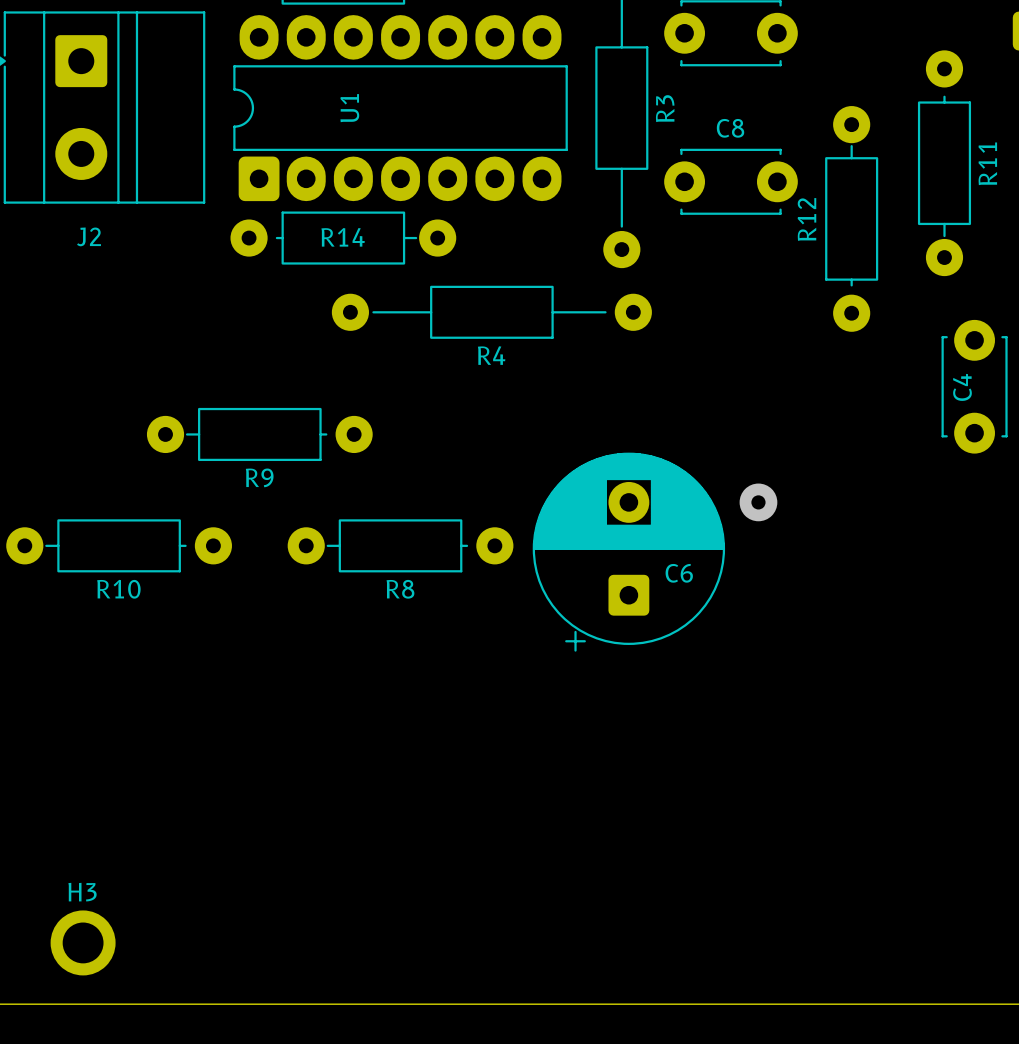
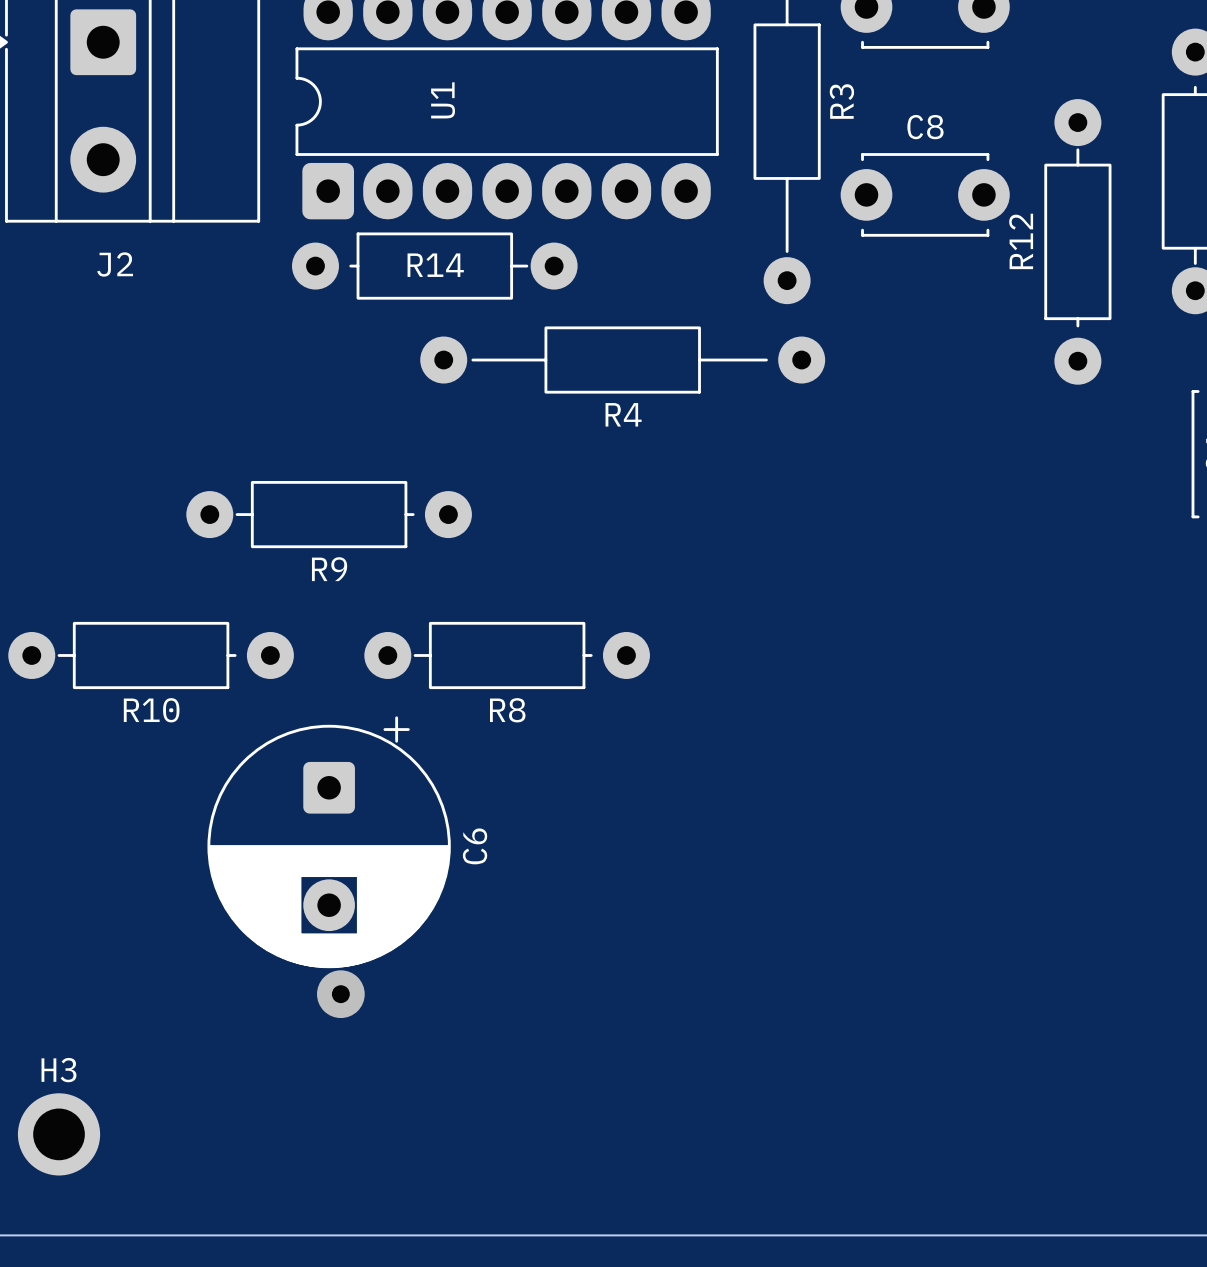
via: (758, 502) -> none
C6 rotation: 0° (628, 552) -> 180° (329, 842)
C6 position: (628, 552) -> (329, 842)
C6 name position: C6 (679, 573) -> C6 (475, 846)
via: none -> (340, 994)
H3 position: (83, 942) -> (59, 1134)

